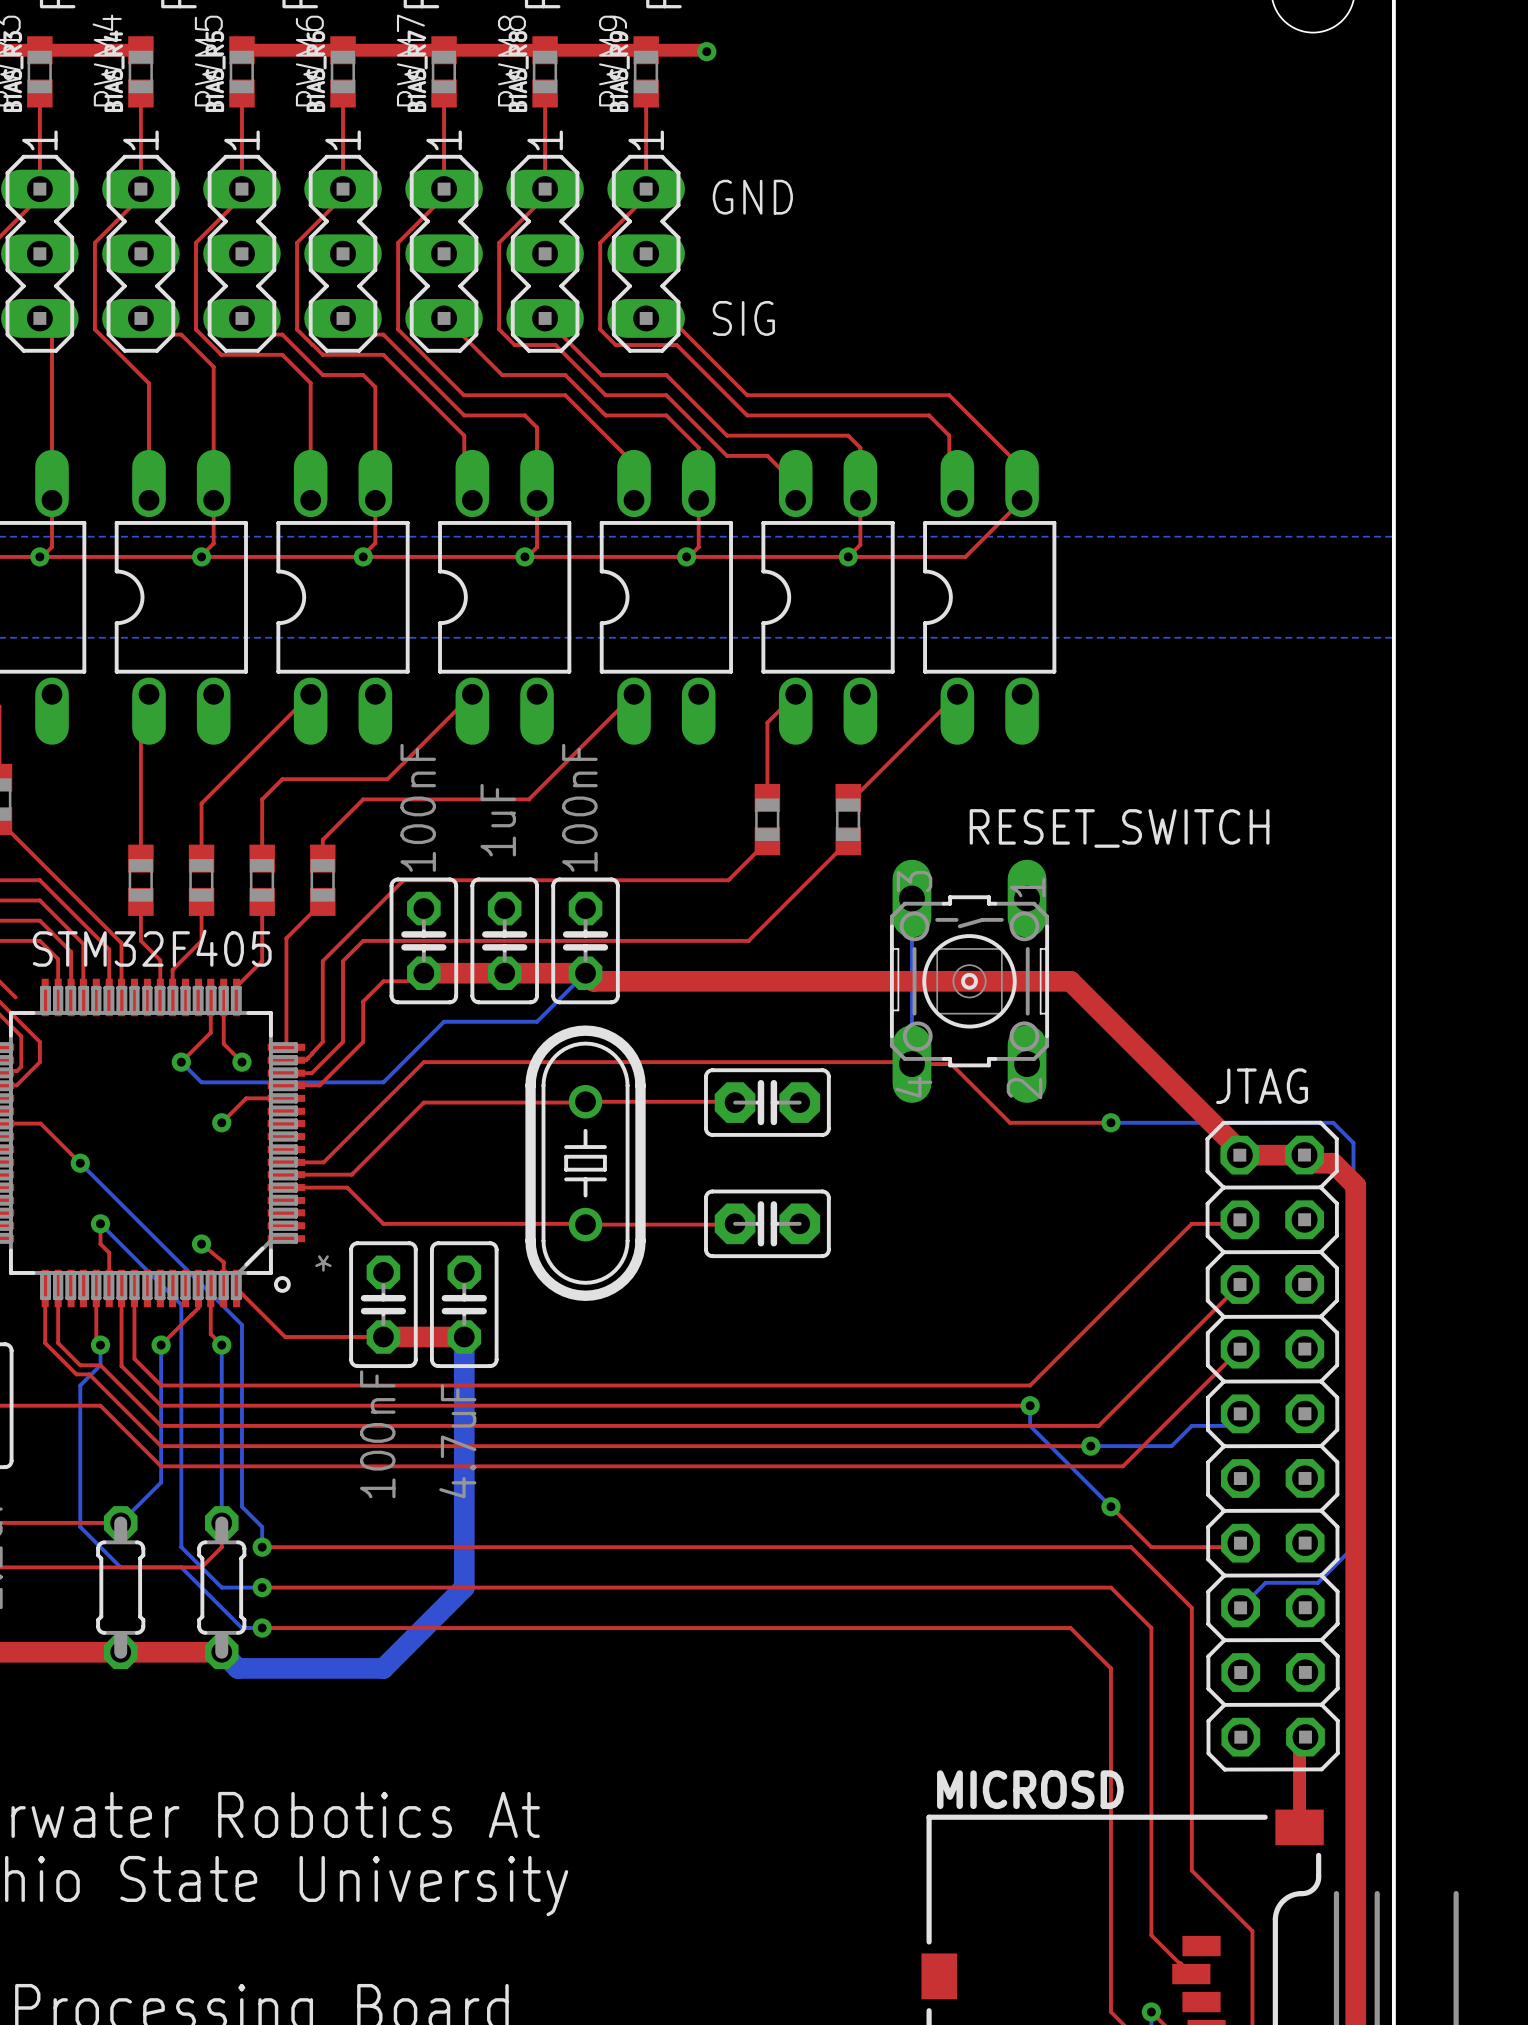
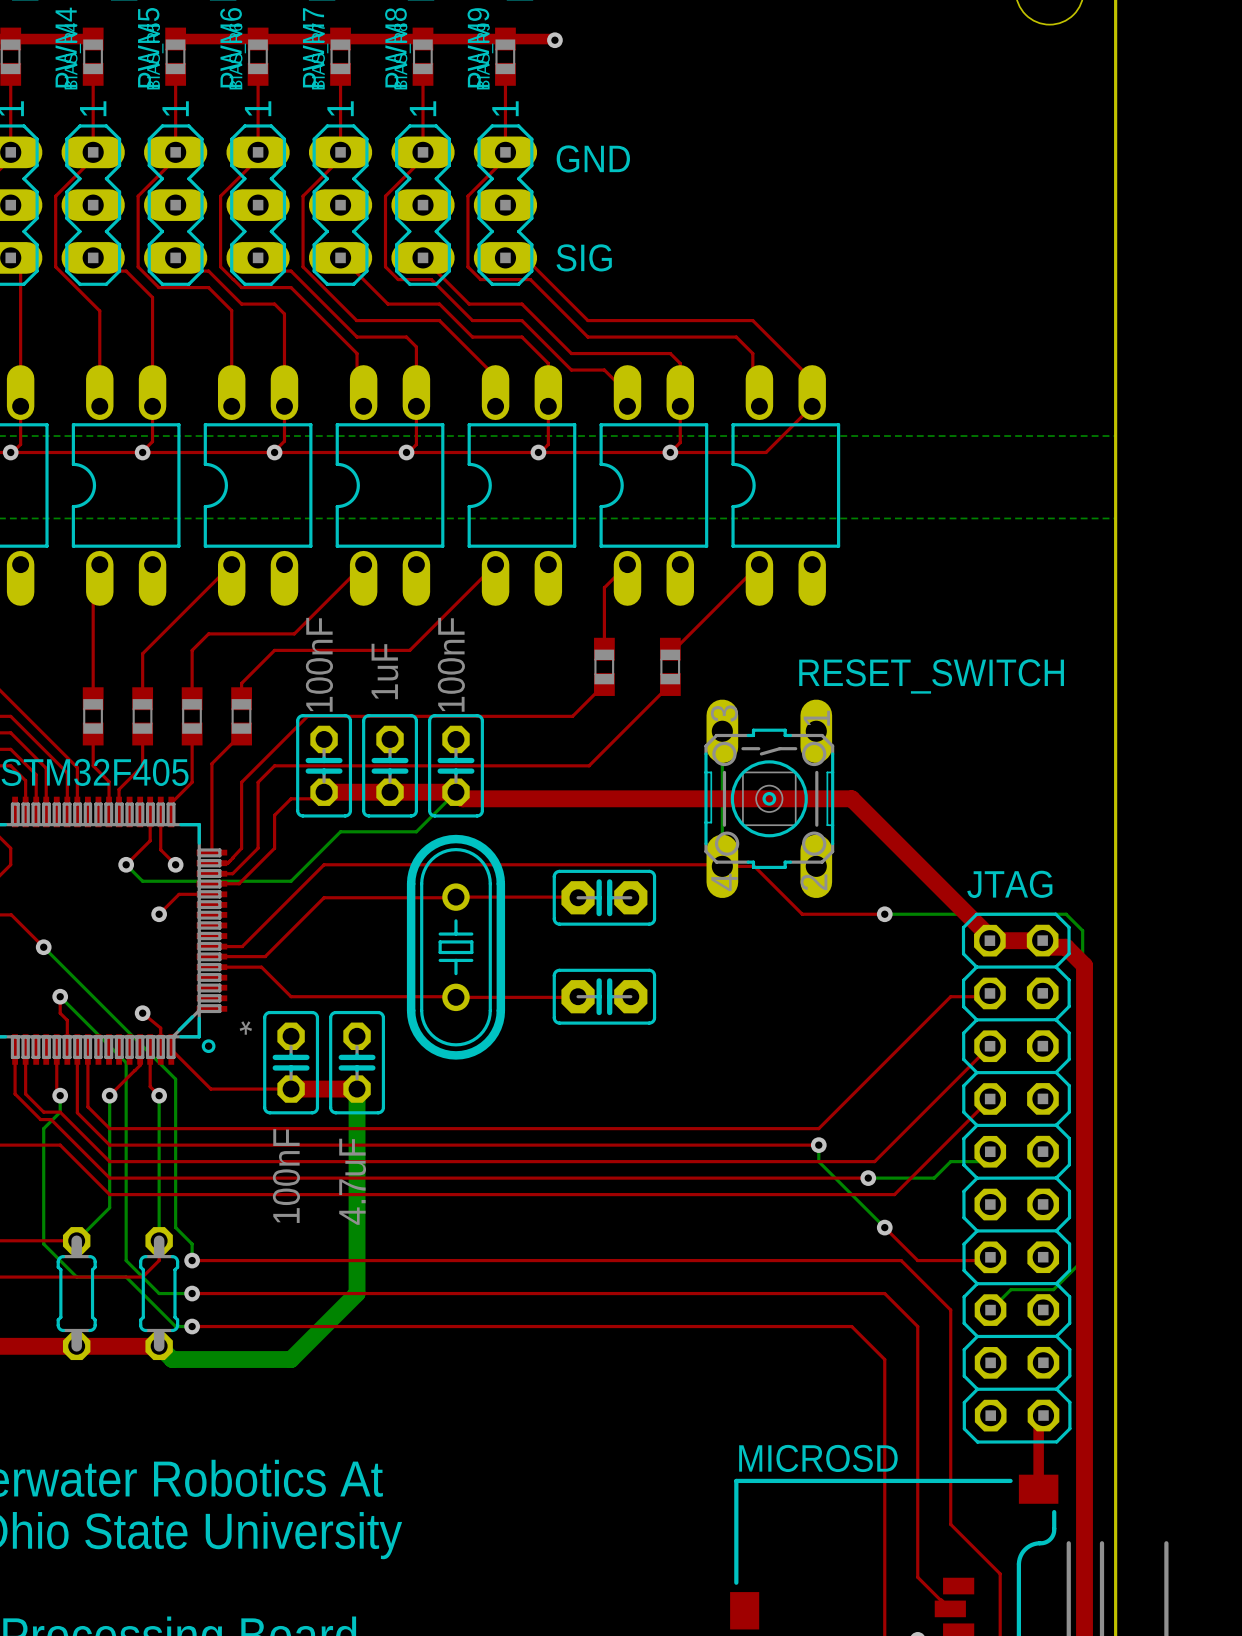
RESET_SWITCH name position: RESET_SWITCH (1119, 828) -> RESET_SWITCH (931, 676)

